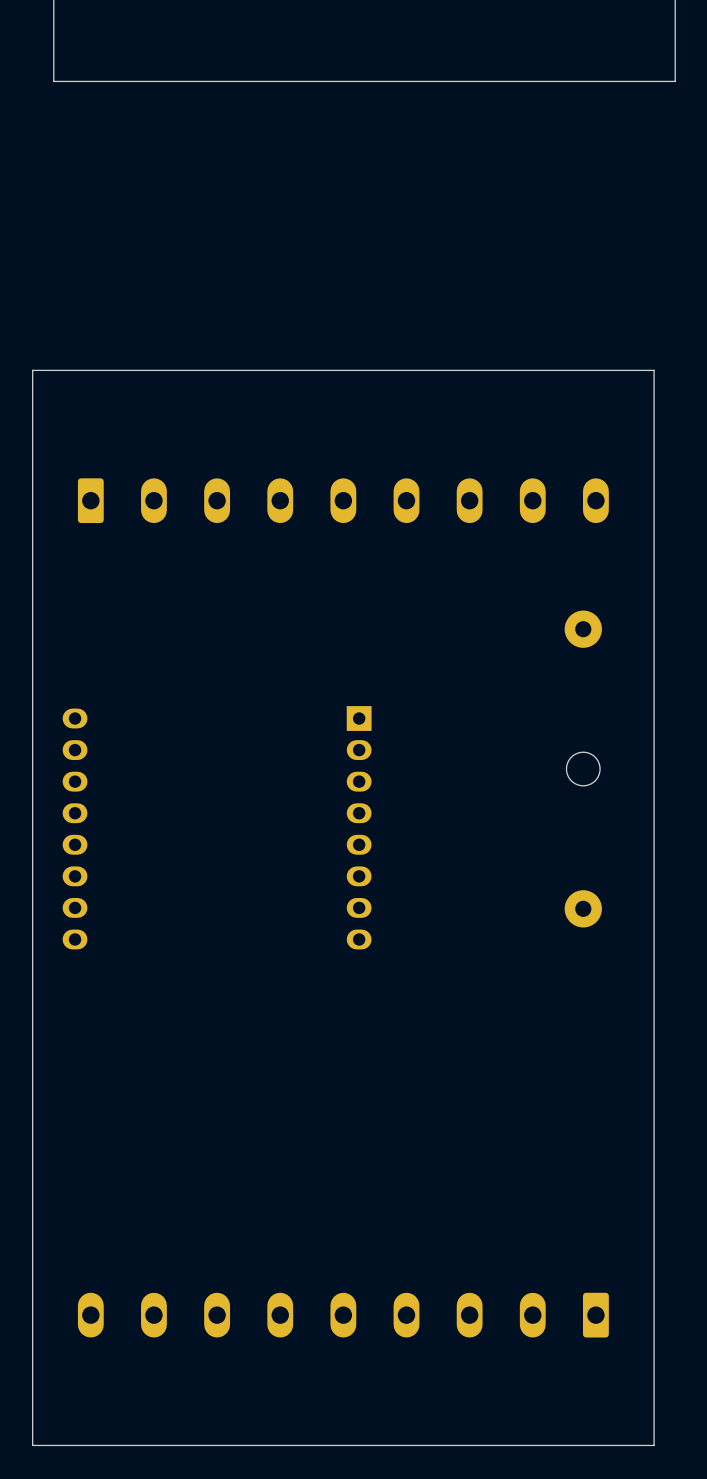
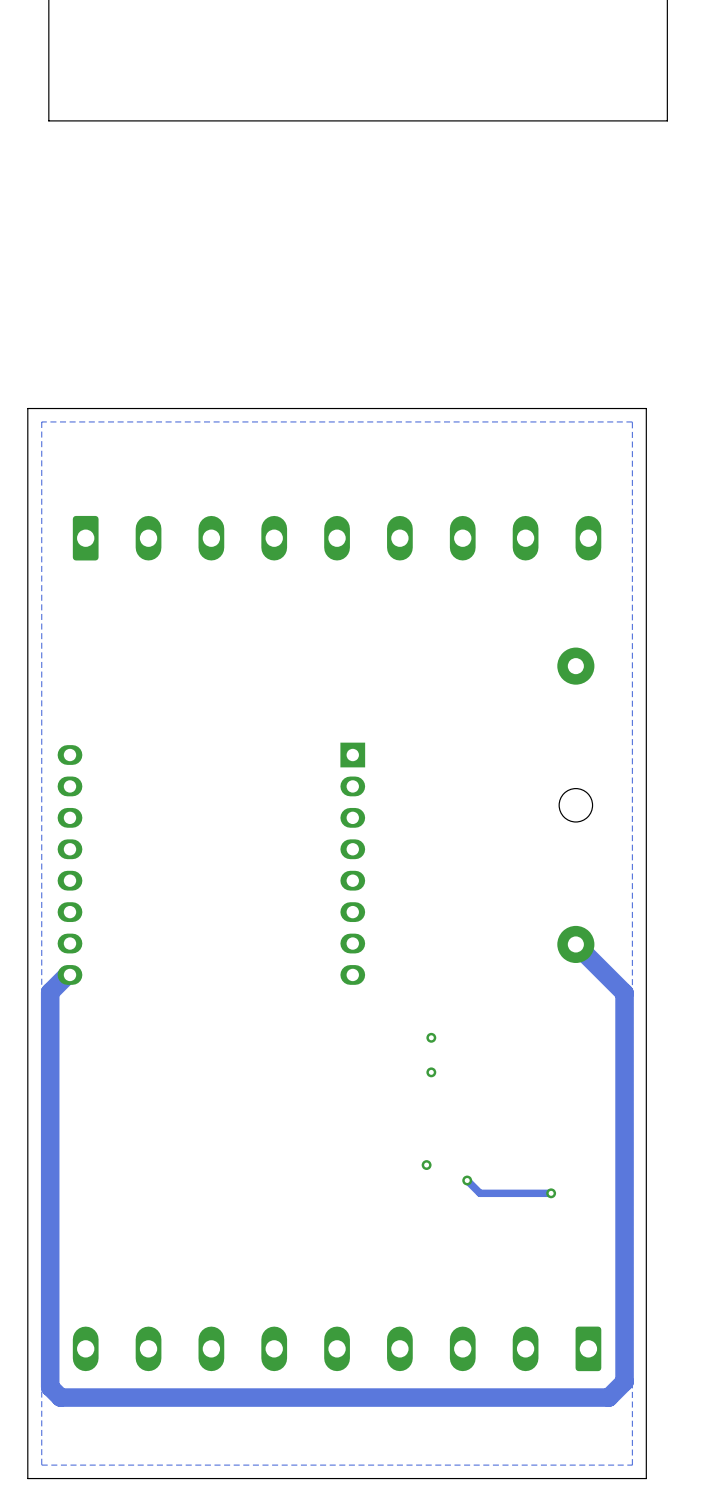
zone outline: none -> (632, 421) (632, 1465) (41, 1465) (41, 421) (632, 421)
track: none -> (575, 944) (624, 993) (624, 1381) (608, 1397) (60, 1397) (50, 1387) (50, 992) (67, 974) (69, 974)
via: none -> (431, 1037)
via: none -> (431, 1072)
via: none -> (426, 1165)
track: none -> (467, 1180) (480, 1193) (551, 1193)
via: none -> (467, 1180)
via: none -> (551, 1193)

